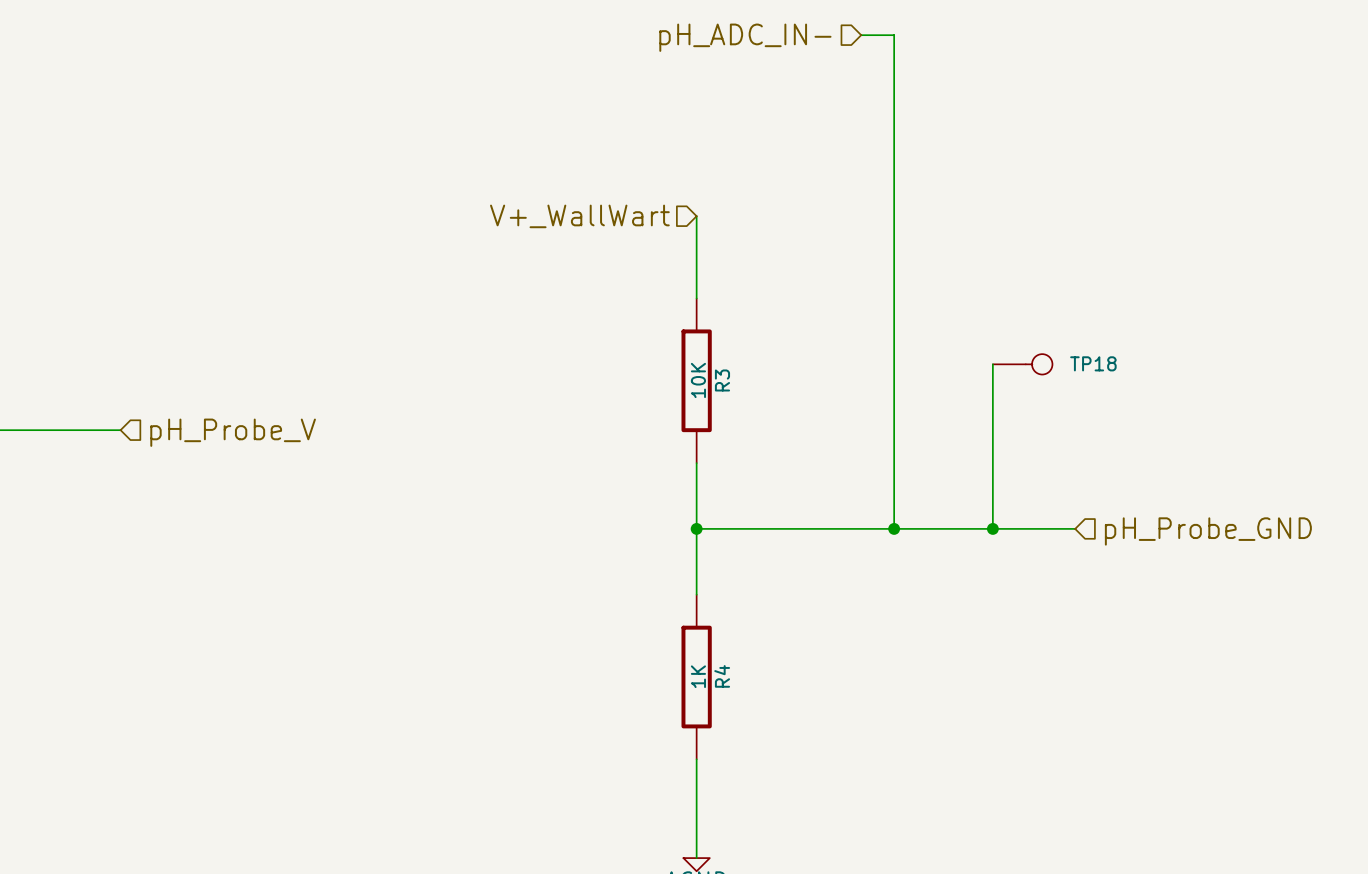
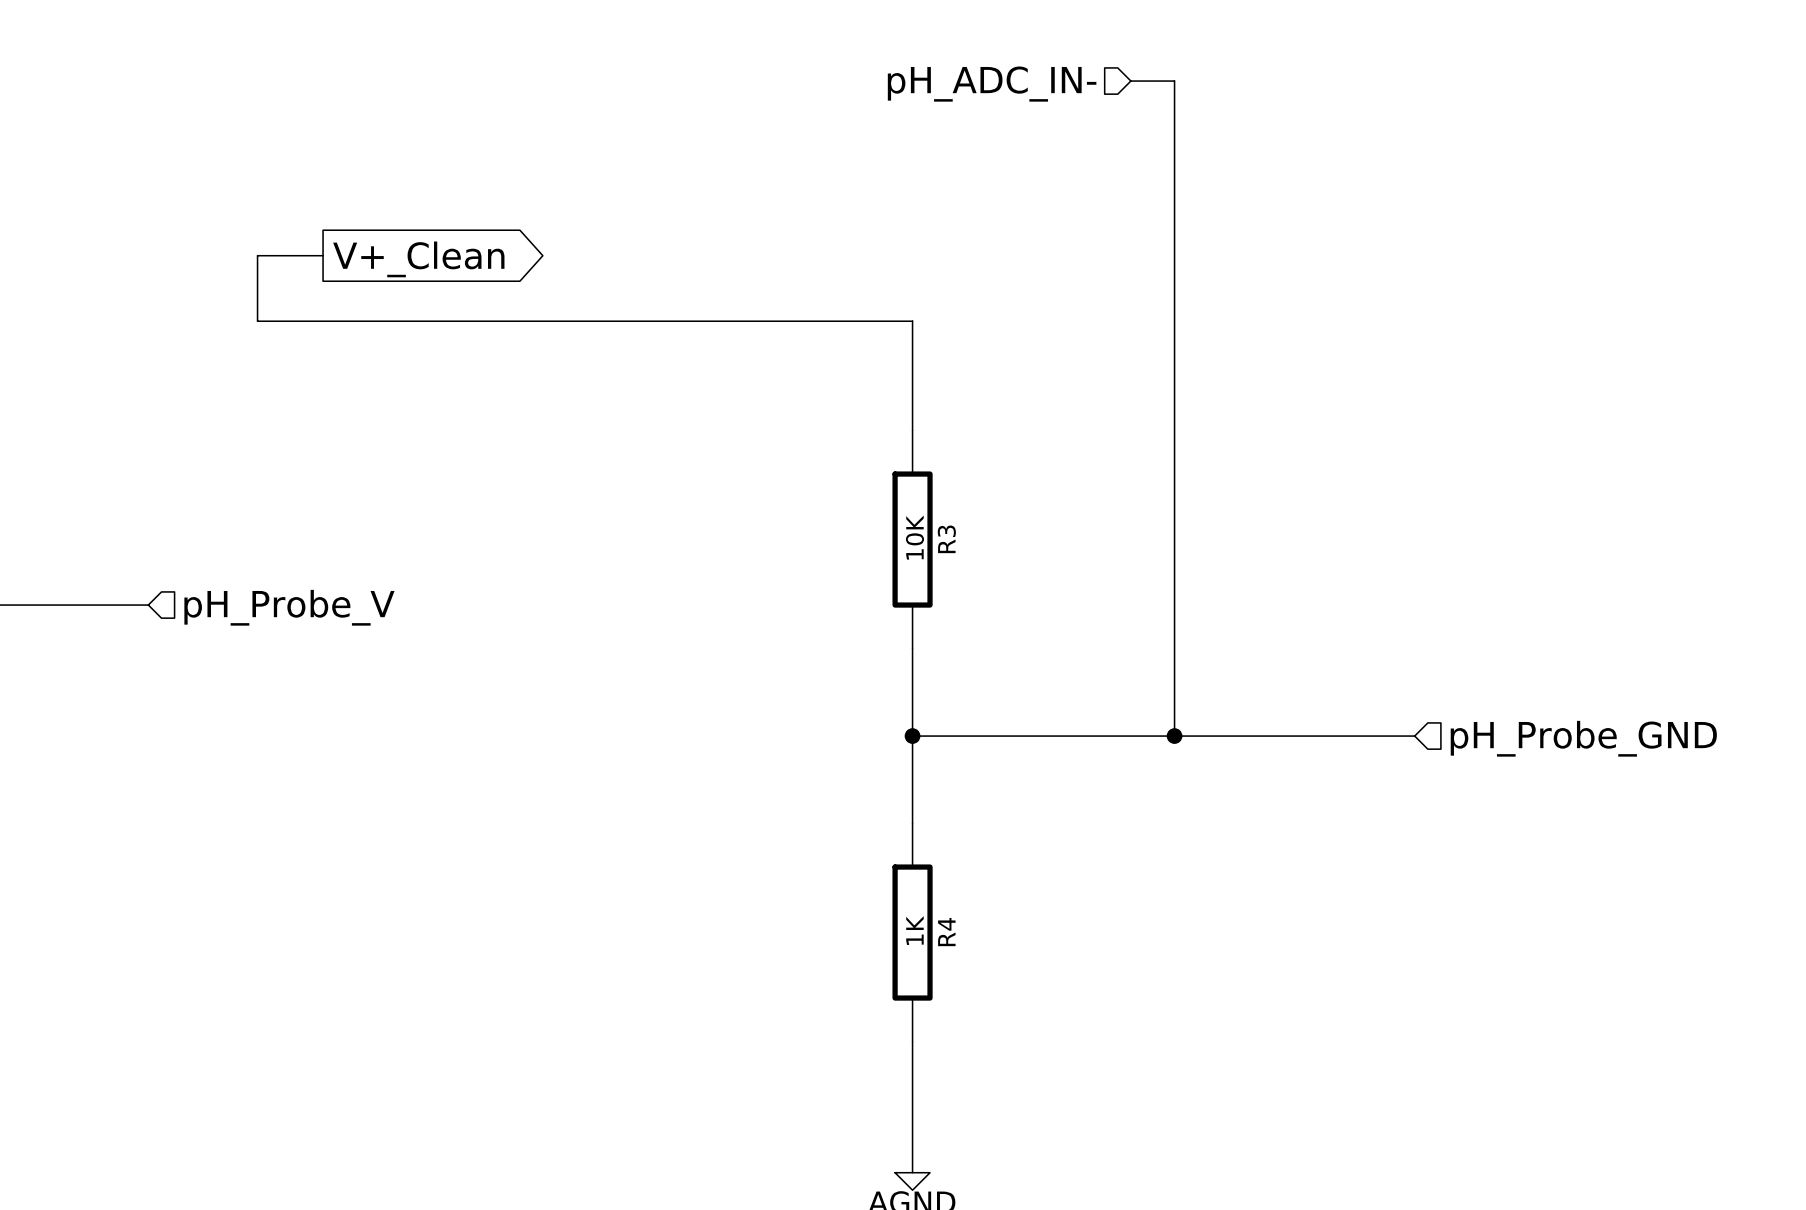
wire: none -> (323, 255) (257, 255) (257, 321) (912, 321)
global label: none -> V+_Clean (418, 259)
hierarchical label: V+_WallWart (579, 216) -> none
wire: (992, 364) (992, 528) -> none
TP18: (1022, 364) -> none
junction: (992, 528) -> none

